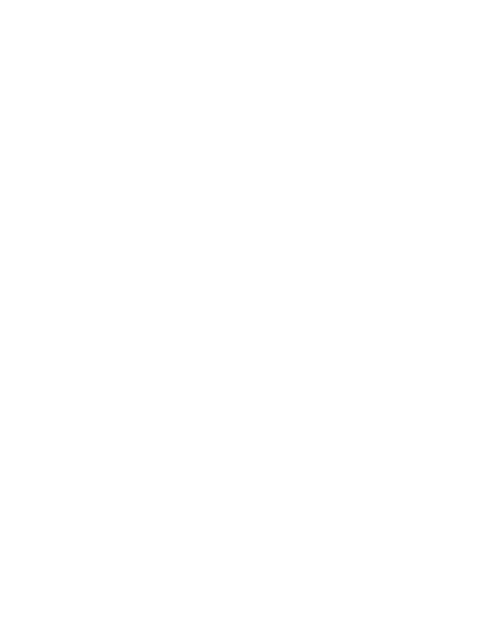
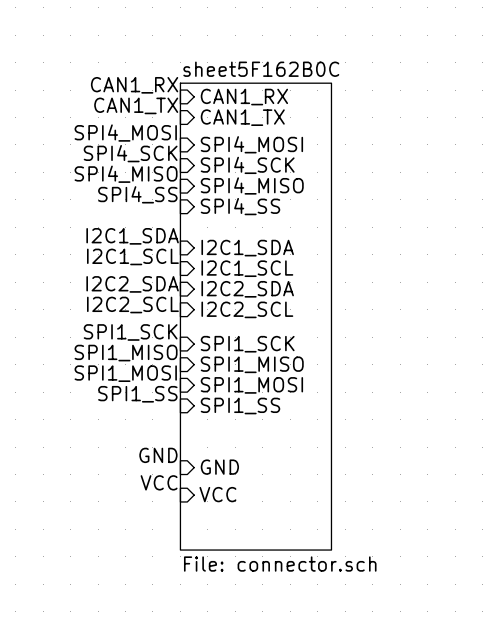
label: none -> CAN1_RX (134, 85)
sheet pin: none -> CAN1_RX (244, 97)
label: none -> CAN1_TX (136, 105)
sheet pin: none -> CAN1_TX (242, 117)
label: none -> SPI4_MOSI (125, 133)
sheet pin: none -> SPI4_MOSI (251, 144)
label: none -> SPI4_SCK (130, 153)
sheet pin: none -> SPI4_SCK (247, 165)
label: none -> SPI4_MISO (126, 174)
sheet pin: none -> SPI4_MISO (252, 185)
label: none -> SPI4_SS (137, 194)
sheet pin: none -> SPI4_SS (240, 206)
label: none -> I2C1_SDA (132, 236)
sheet pin: none -> I2C1_SDA (247, 248)
label: none -> I2C1_SCL (132, 256)
sheet pin: none -> I2C1_SCL (247, 268)
label: none -> I2C2_SDA (132, 284)
sheet pin: none -> I2C2_SDA (247, 289)
label: none -> I2C2_SCL (132, 305)
sheet pin: none -> I2C2_SCL (247, 309)
sheet sheet5F162B0C: none -> File: connector.sch (255, 316)
label: none -> SPI1_SCK (130, 332)
sheet pin: none -> SPI1_SCK (247, 344)
label: none -> SPI1_MISO (126, 353)
sheet pin: none -> SPI1_MISO (252, 364)
label: none -> SPI1_MOSI (125, 373)
sheet pin: none -> SPI1_MOSI (251, 385)
label: none -> SPI1_SS (137, 394)
sheet pin: none -> SPI1_SS (240, 406)
label: none -> GND (158, 455)
sheet pin: none -> GND (219, 467)
label: none -> VCC (159, 482)
sheet pin: none -> VCC (217, 494)

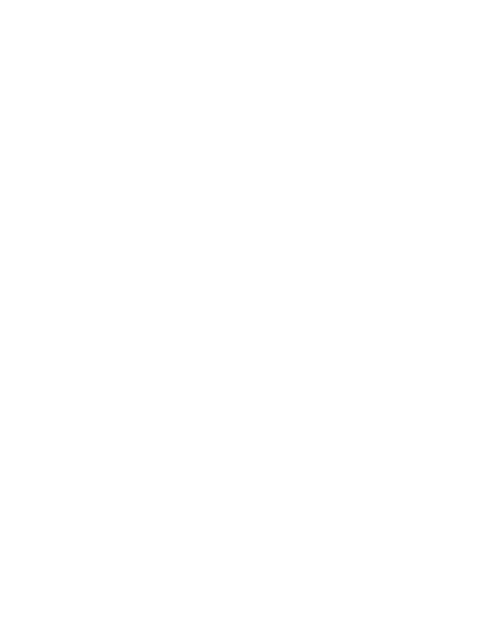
label: CAN1_RX (134, 85) -> none
sheet pin: CAN1_RX (244, 97) -> none
label: CAN1_TX (136, 105) -> none
sheet pin: CAN1_TX (242, 117) -> none
label: SPI4_MOSI (125, 133) -> none
sheet pin: SPI4_MOSI (251, 144) -> none
label: SPI4_SCK (130, 153) -> none
sheet pin: SPI4_SCK (247, 165) -> none
label: SPI4_MISO (126, 174) -> none
sheet pin: SPI4_MISO (252, 185) -> none
label: SPI4_SS (137, 194) -> none
sheet pin: SPI4_SS (240, 206) -> none
label: I2C1_SDA (132, 236) -> none
sheet pin: I2C1_SDA (247, 248) -> none
label: I2C1_SCL (132, 256) -> none
sheet pin: I2C1_SCL (247, 268) -> none
label: I2C2_SDA (132, 284) -> none
sheet pin: I2C2_SDA (247, 289) -> none
label: I2C2_SCL (132, 305) -> none
sheet pin: I2C2_SCL (247, 309) -> none
sheet sheet5F162B0C: File: connector.sch (255, 316) -> none
label: SPI1_SCK (130, 332) -> none
sheet pin: SPI1_SCK (247, 344) -> none
label: SPI1_MISO (126, 353) -> none
sheet pin: SPI1_MISO (252, 364) -> none
label: SPI1_MOSI (125, 373) -> none
sheet pin: SPI1_MOSI (251, 385) -> none
label: SPI1_SS (137, 394) -> none
sheet pin: SPI1_SS (240, 406) -> none
label: GND (158, 455) -> none
sheet pin: GND (219, 467) -> none
label: VCC (159, 482) -> none
sheet pin: VCC (217, 494) -> none

